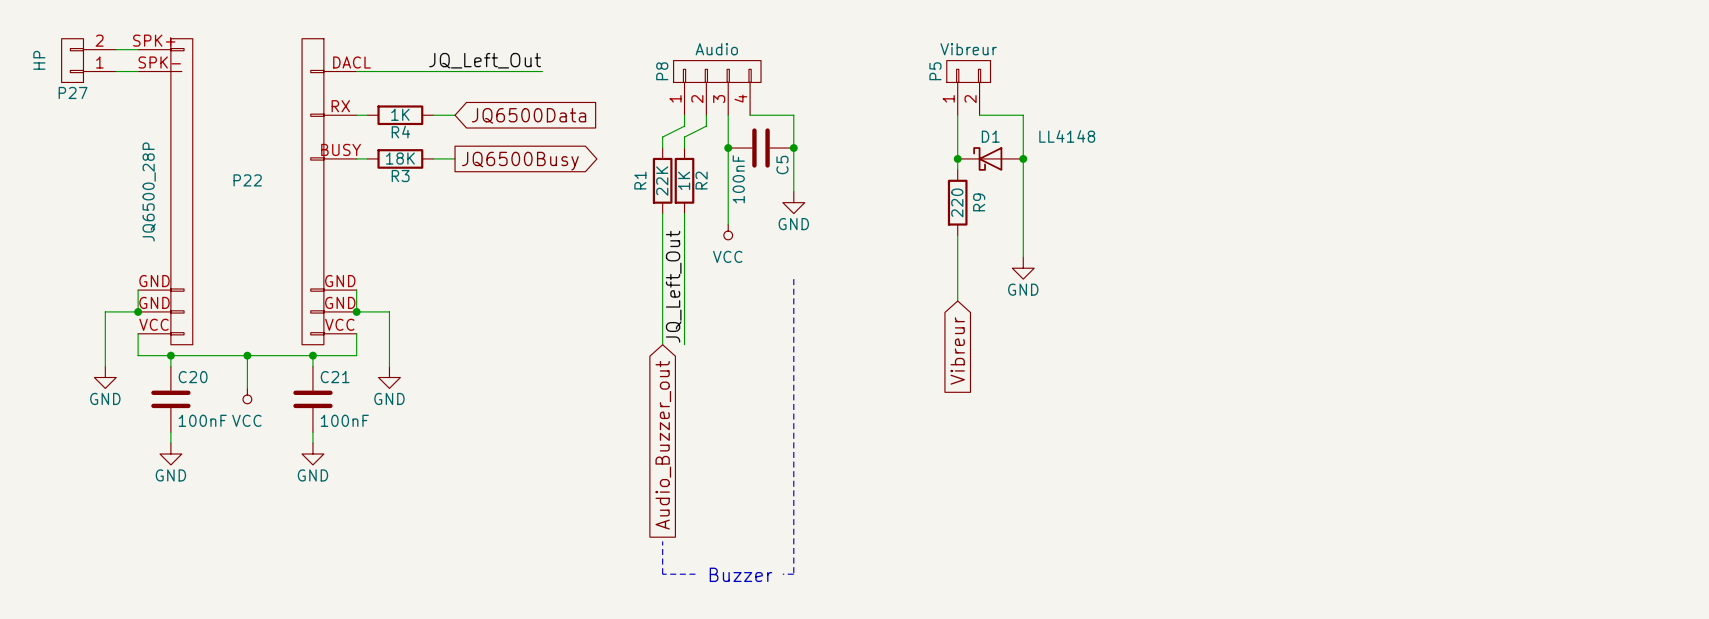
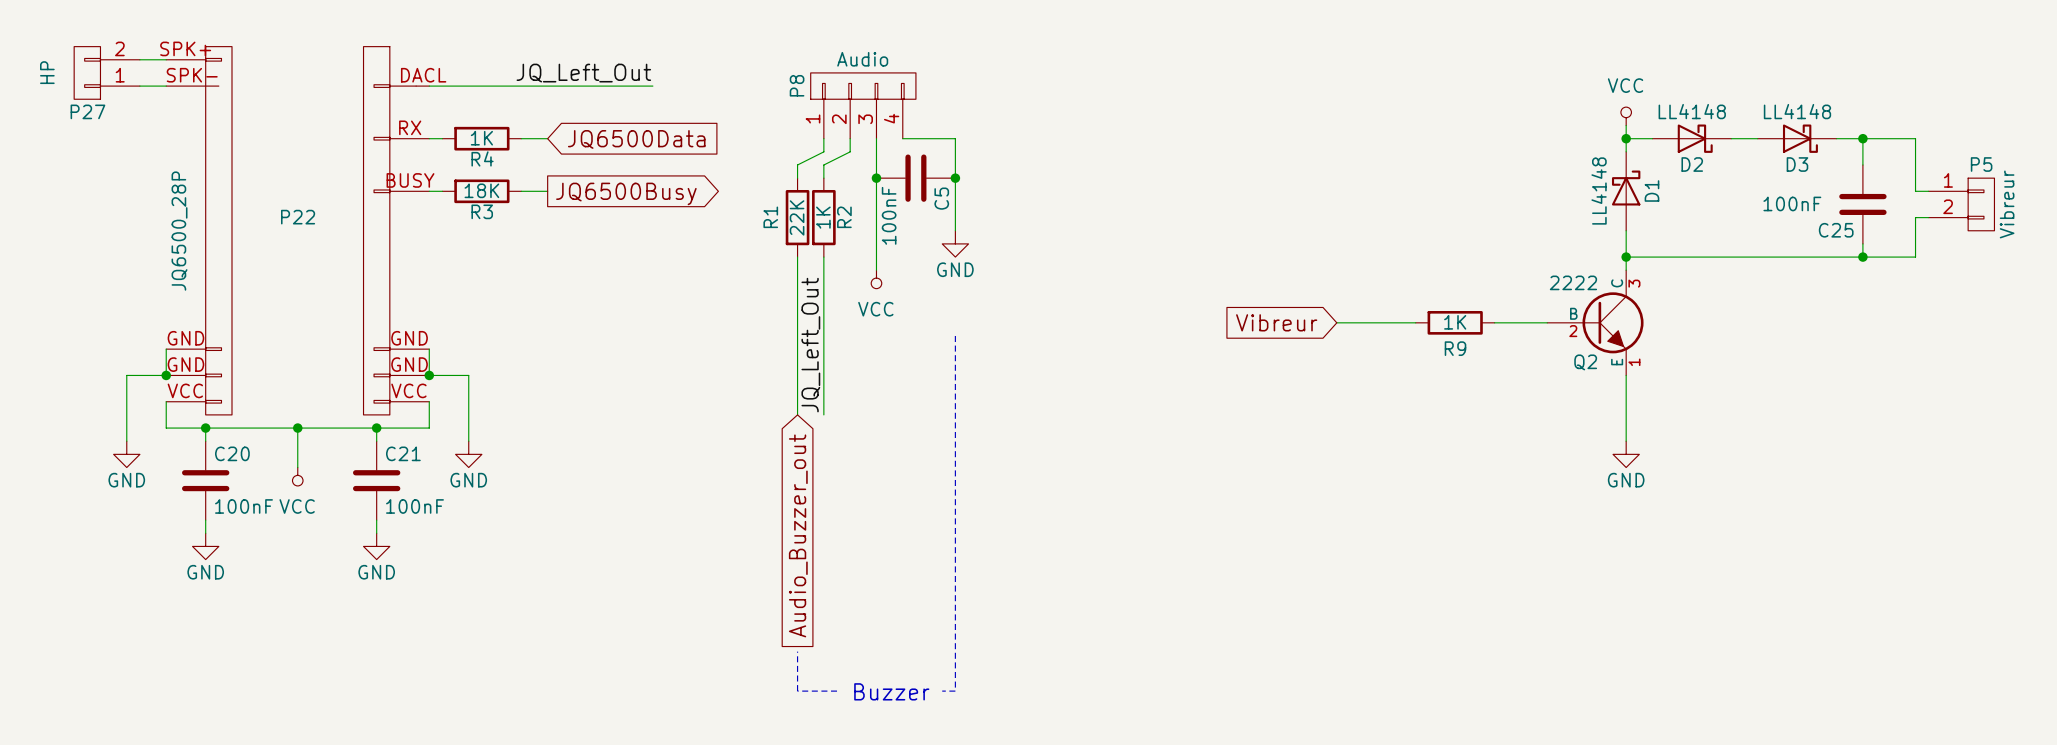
P5 rotation: 0° (968, 71) -> 90° clockwise (1981, 204)
P5 position: (968, 87) -> (1961, 204)
power symbol: none -> VCC (1626, 116)
wire: none -> (1626, 125) (1626, 151)
wire: (957, 115) (957, 169) -> none
wire: (979, 115) (1023, 115) (1023, 257) -> none
wire: none -> (1626, 138) (1652, 138)
junction: none -> (1626, 138)
D2: none -> LL4148 (1691, 138)
wire: none -> (1731, 138) (1757, 138)
D3: none -> LL4148 (1797, 138)
wire: none -> (1836, 138) (1915, 138) (1915, 191) (1928, 191)
wire: none -> (1862, 138) (1862, 165)
junction: none -> (1862, 138)
D1 value position: LL4148 (1067, 136) -> LL4148 (1599, 190)
junction: (957, 158) -> none
D1 rotation: 0° (987, 158) -> 90° clockwise (1626, 188)
D1 position: (990, 158) -> (1626, 191)
junction: (1023, 158) -> none
C25: none -> 100nF (1862, 204)
wire: none -> (1928, 217) (1915, 217) (1915, 257) (1626, 257)
wire: none -> (1626, 230) (1626, 270)
R9 rotation: 0° (957, 202) -> 90° clockwise (1455, 322)
R9 position: (957, 202) -> (1455, 322)
R9 value: 220 (957, 202) -> 1K (1455, 322)
wire: none -> (1862, 243) (1862, 257)
junction: none -> (1626, 257)
junction: none -> (1862, 257)
wire: (957, 235) (957, 301) -> none
power symbol: GND (1023, 268) -> none
wire: none -> (1336, 322) (1415, 322)
wire: none -> (1494, 322) (1547, 322)
Q2: none -> 2222 (1595, 322)
wire: none -> (1626, 375) (1626, 441)
global label rotation: 0° (957, 350) -> 90° clockwise (1276, 322)
global label position: Vibreur (957, 350) -> Vibreur (1276, 322)
power symbol: none -> GND (1626, 454)

